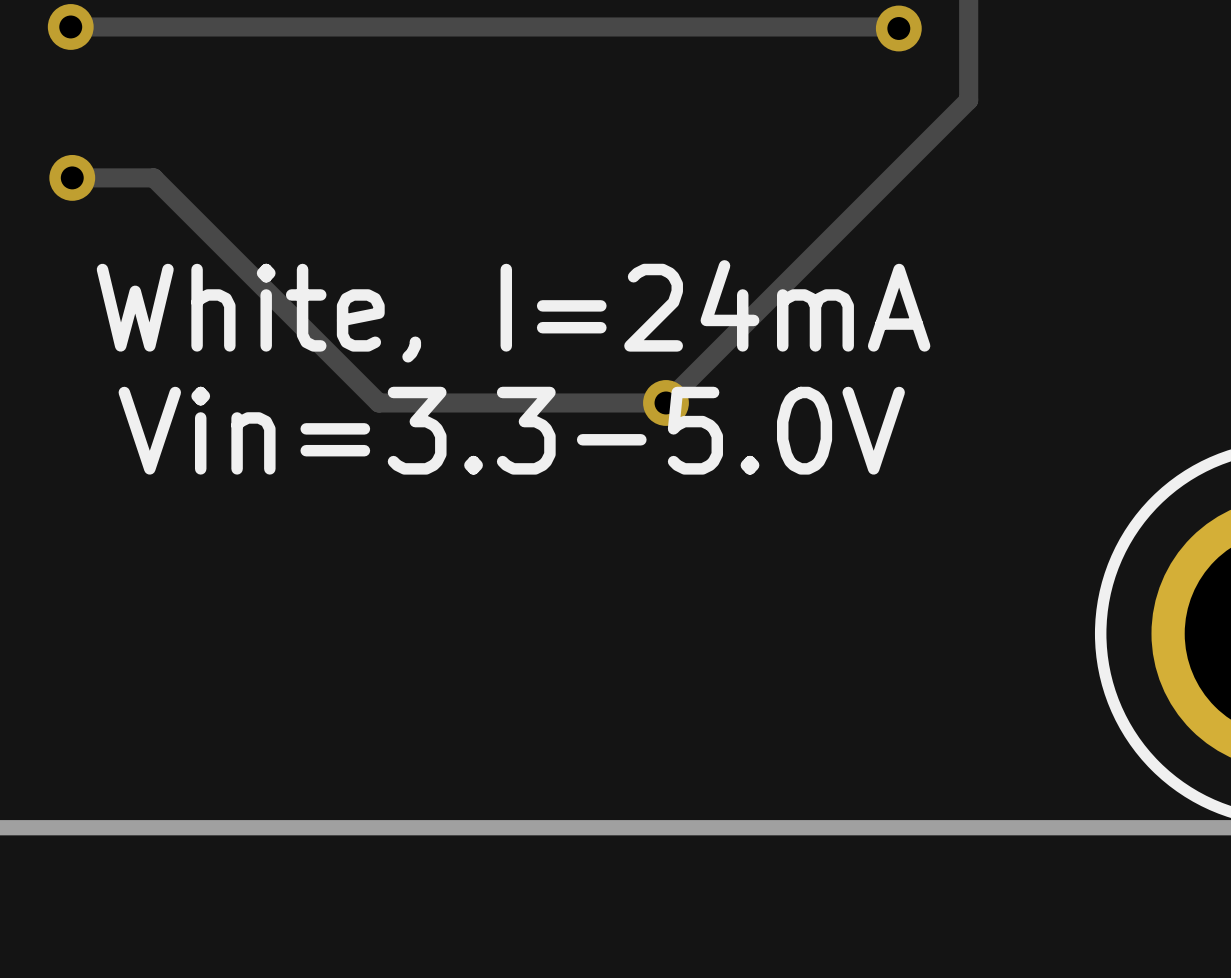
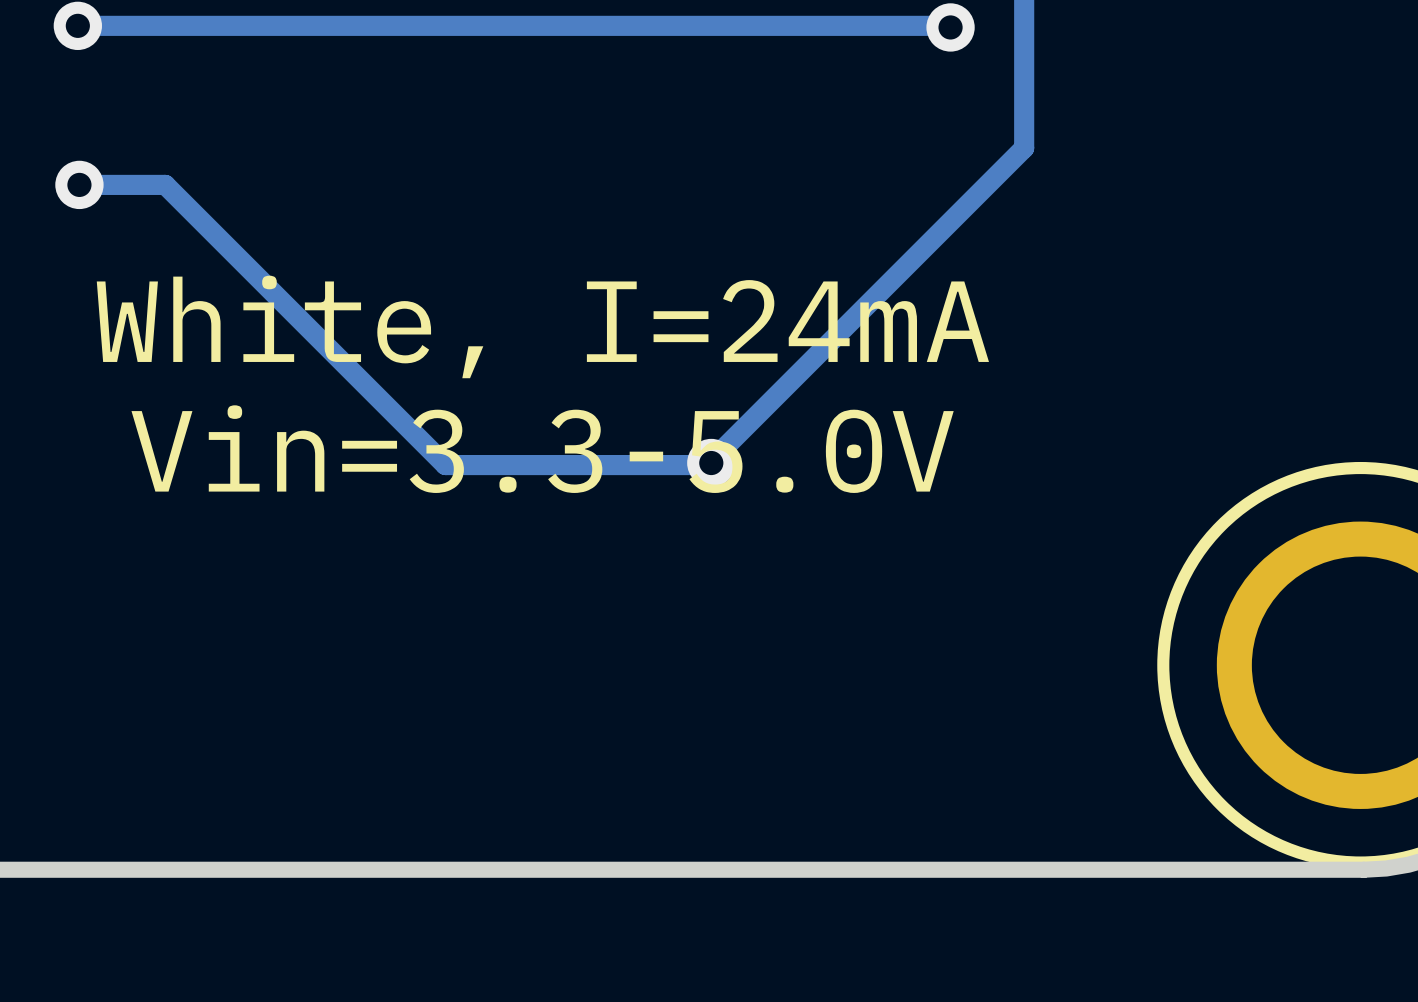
track: (968, 100) (665, 402) (378, 402) -> (1024, 103) (1024, 148) (709, 465) (445, 465) (402, 422)
via position: (665, 402) -> (711, 463)

